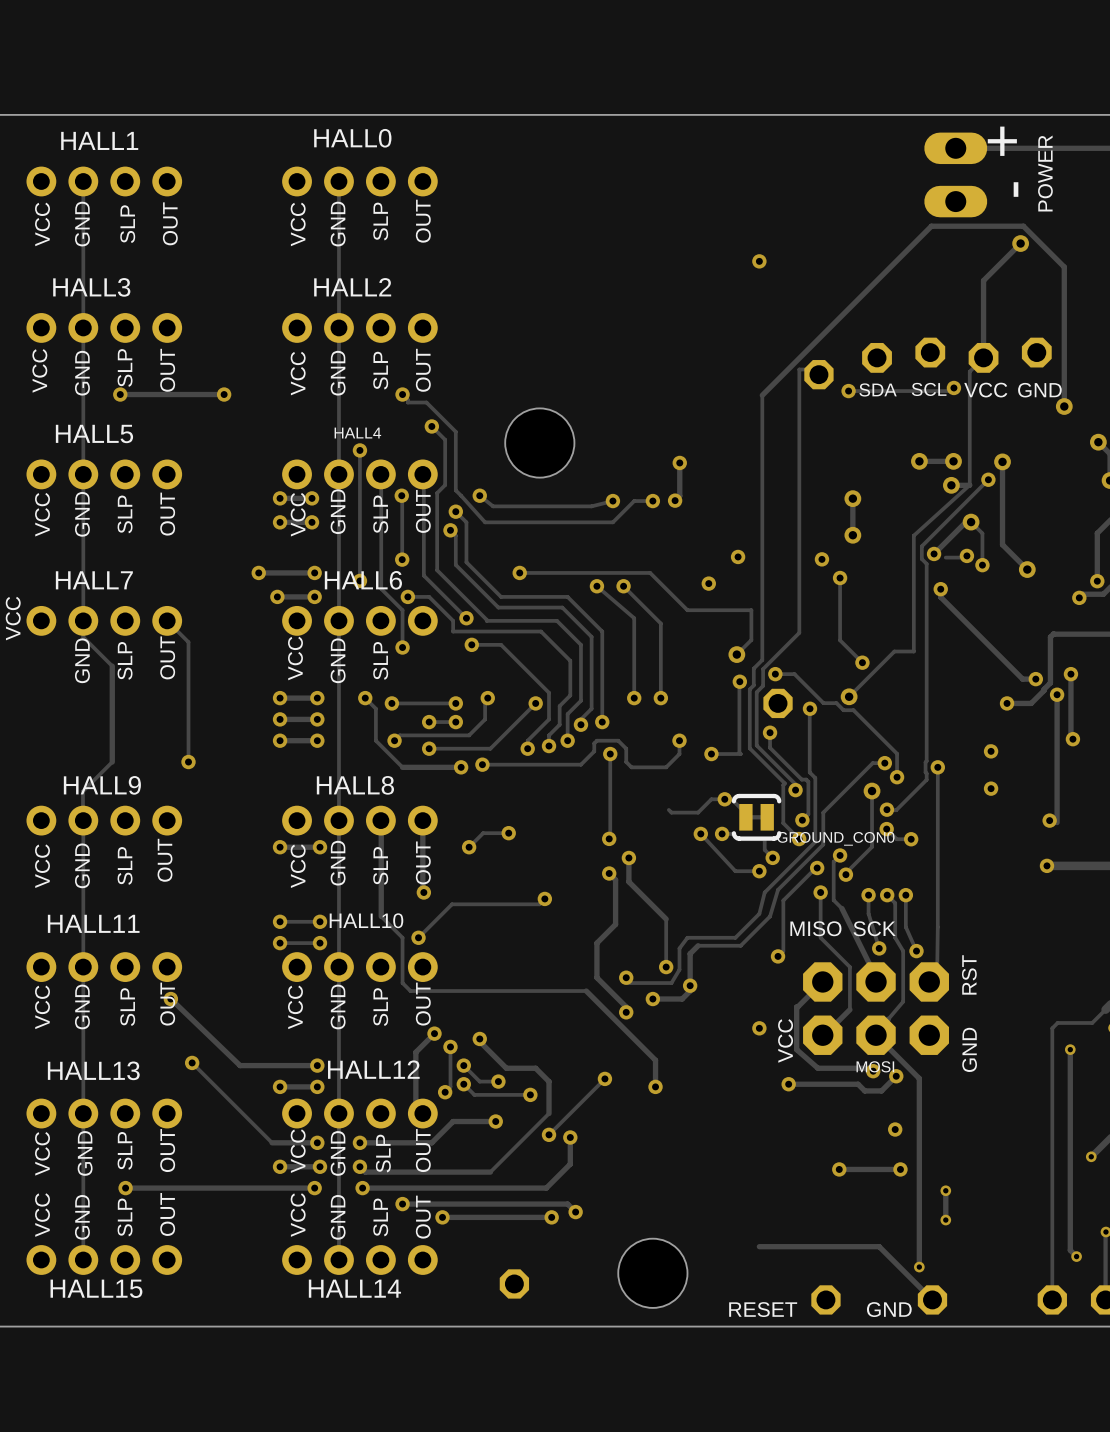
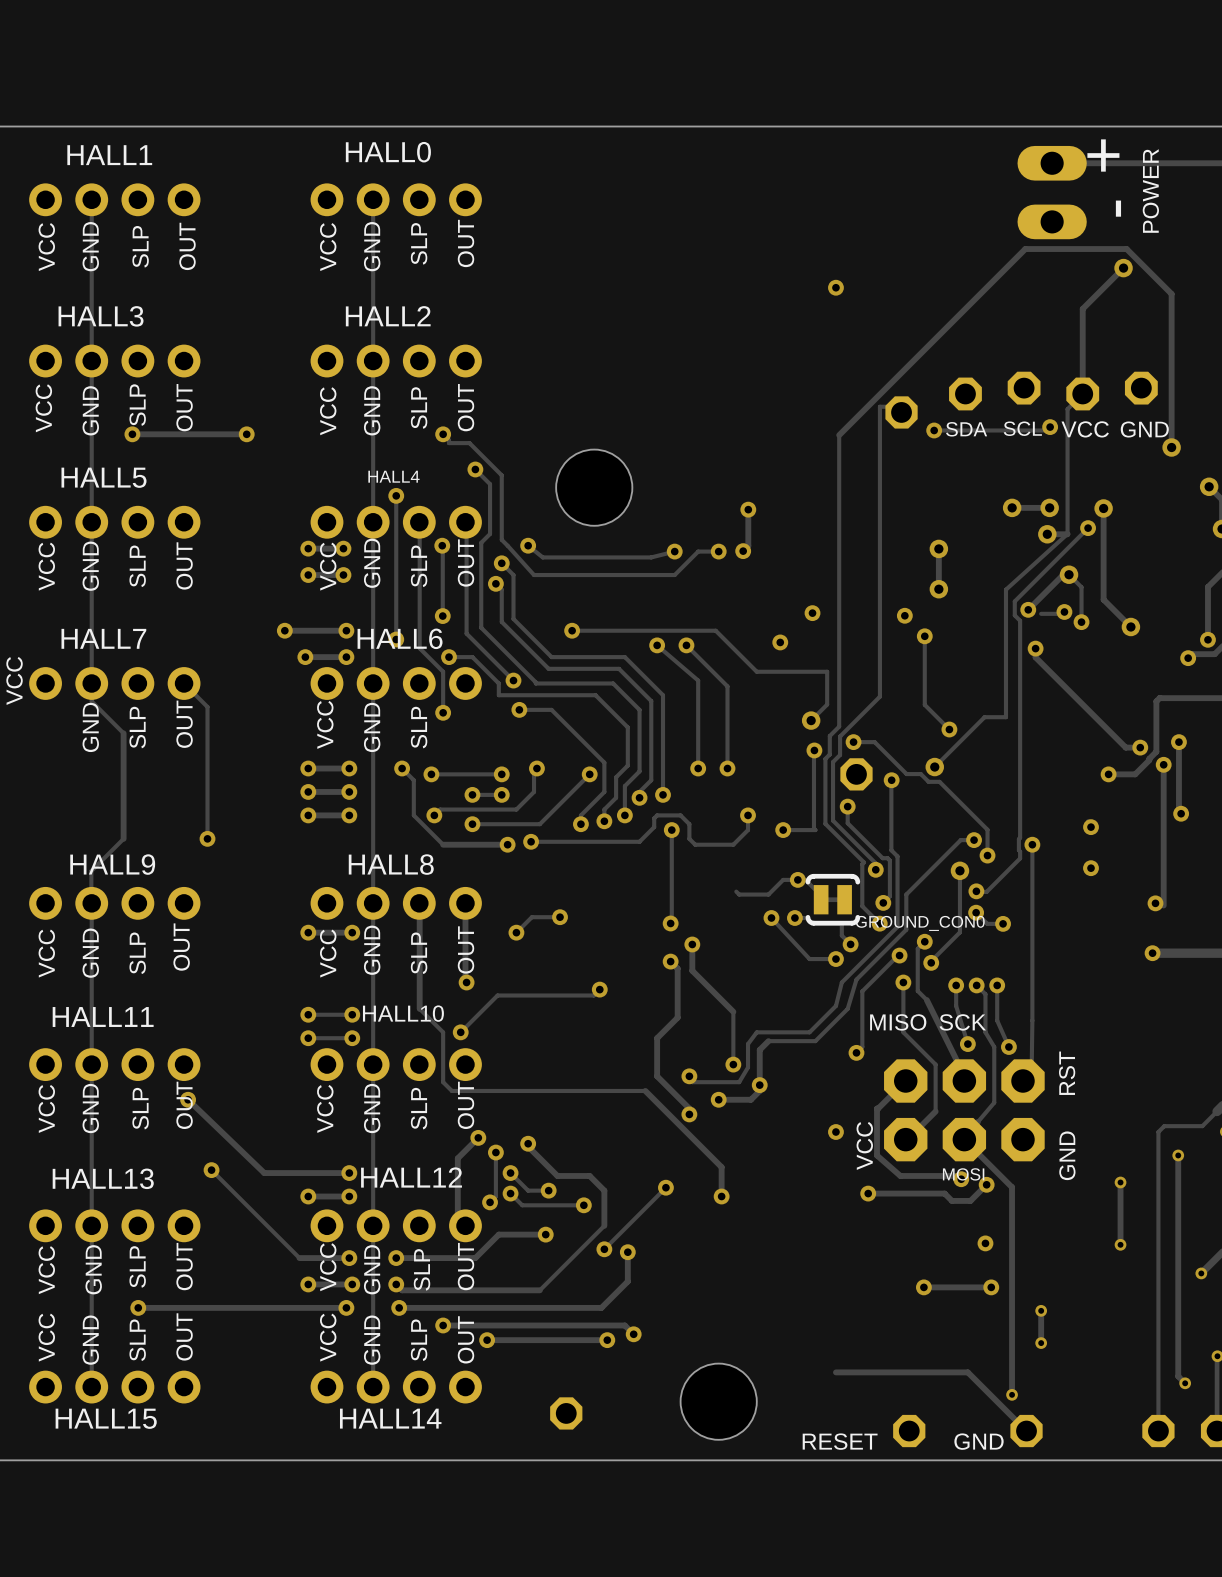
track: none -> (1120, 1182) (1120, 1244)
via: none -> (1120, 1182)
via: none -> (1120, 1244)

